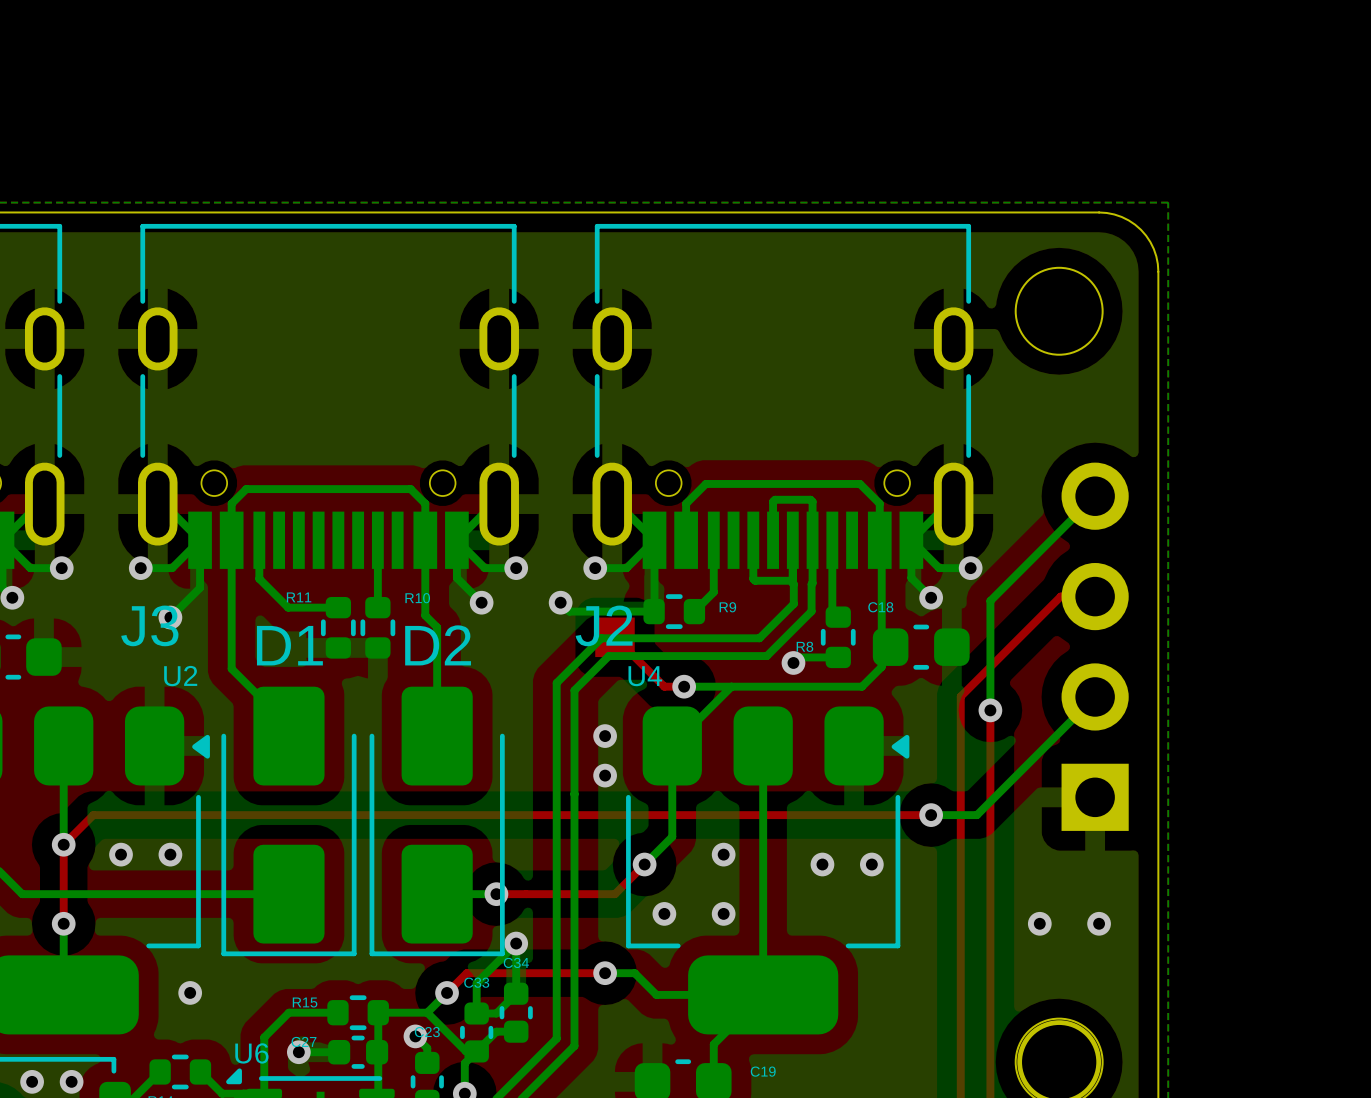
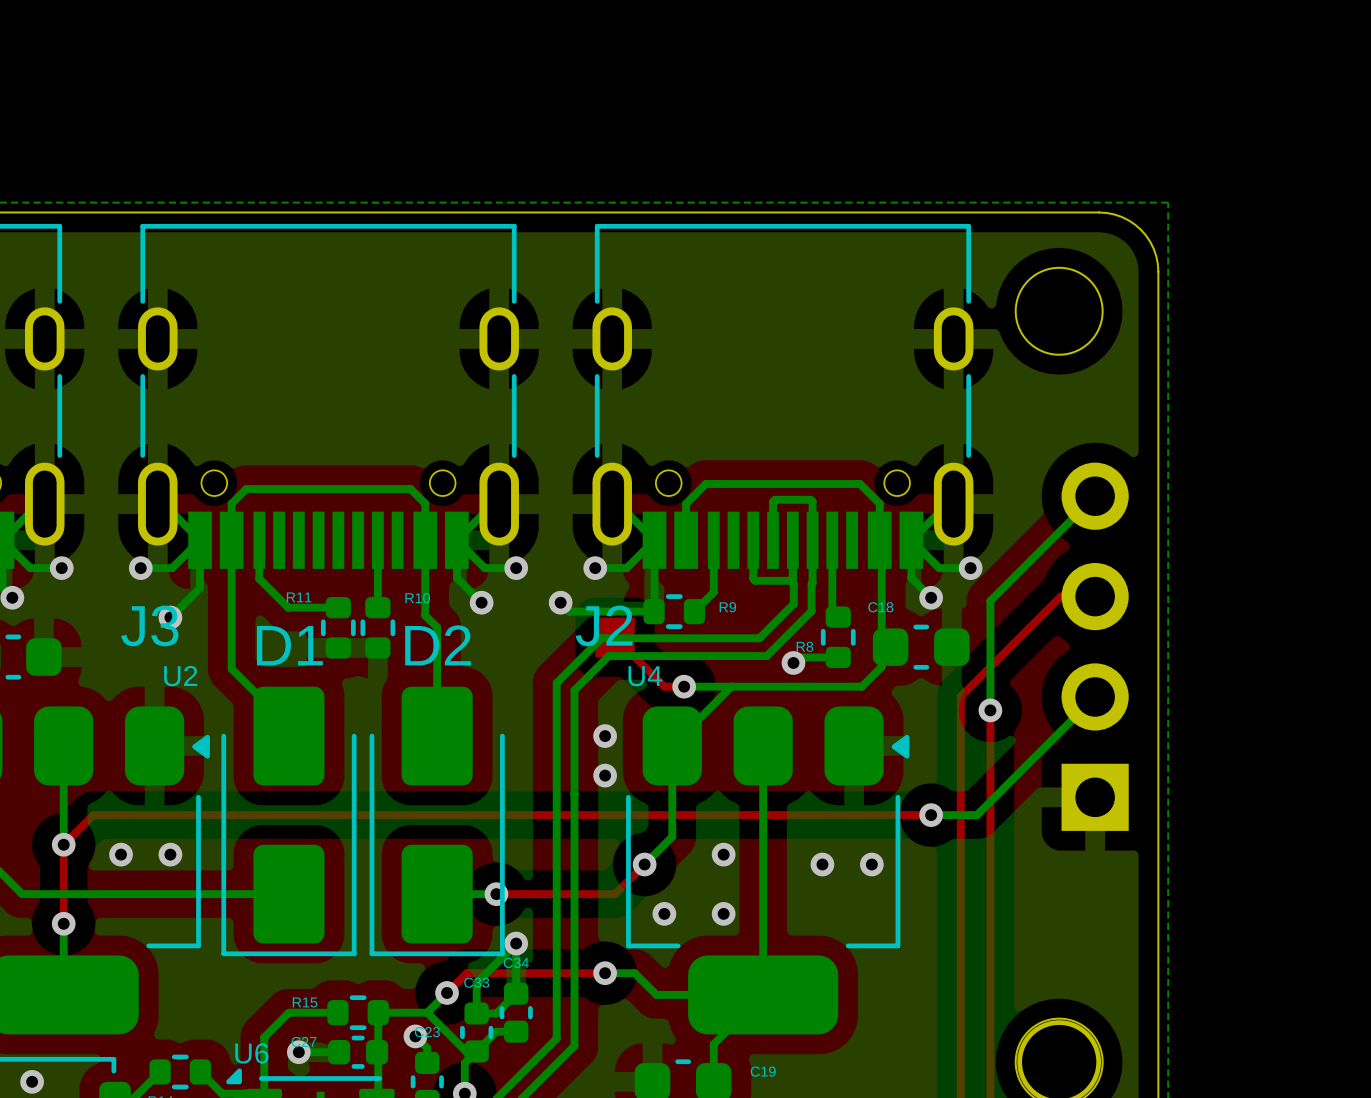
via: (1039, 923) -> none
via: (1099, 923) -> none
via: (190, 992) -> none
via: (71, 1081) -> none

